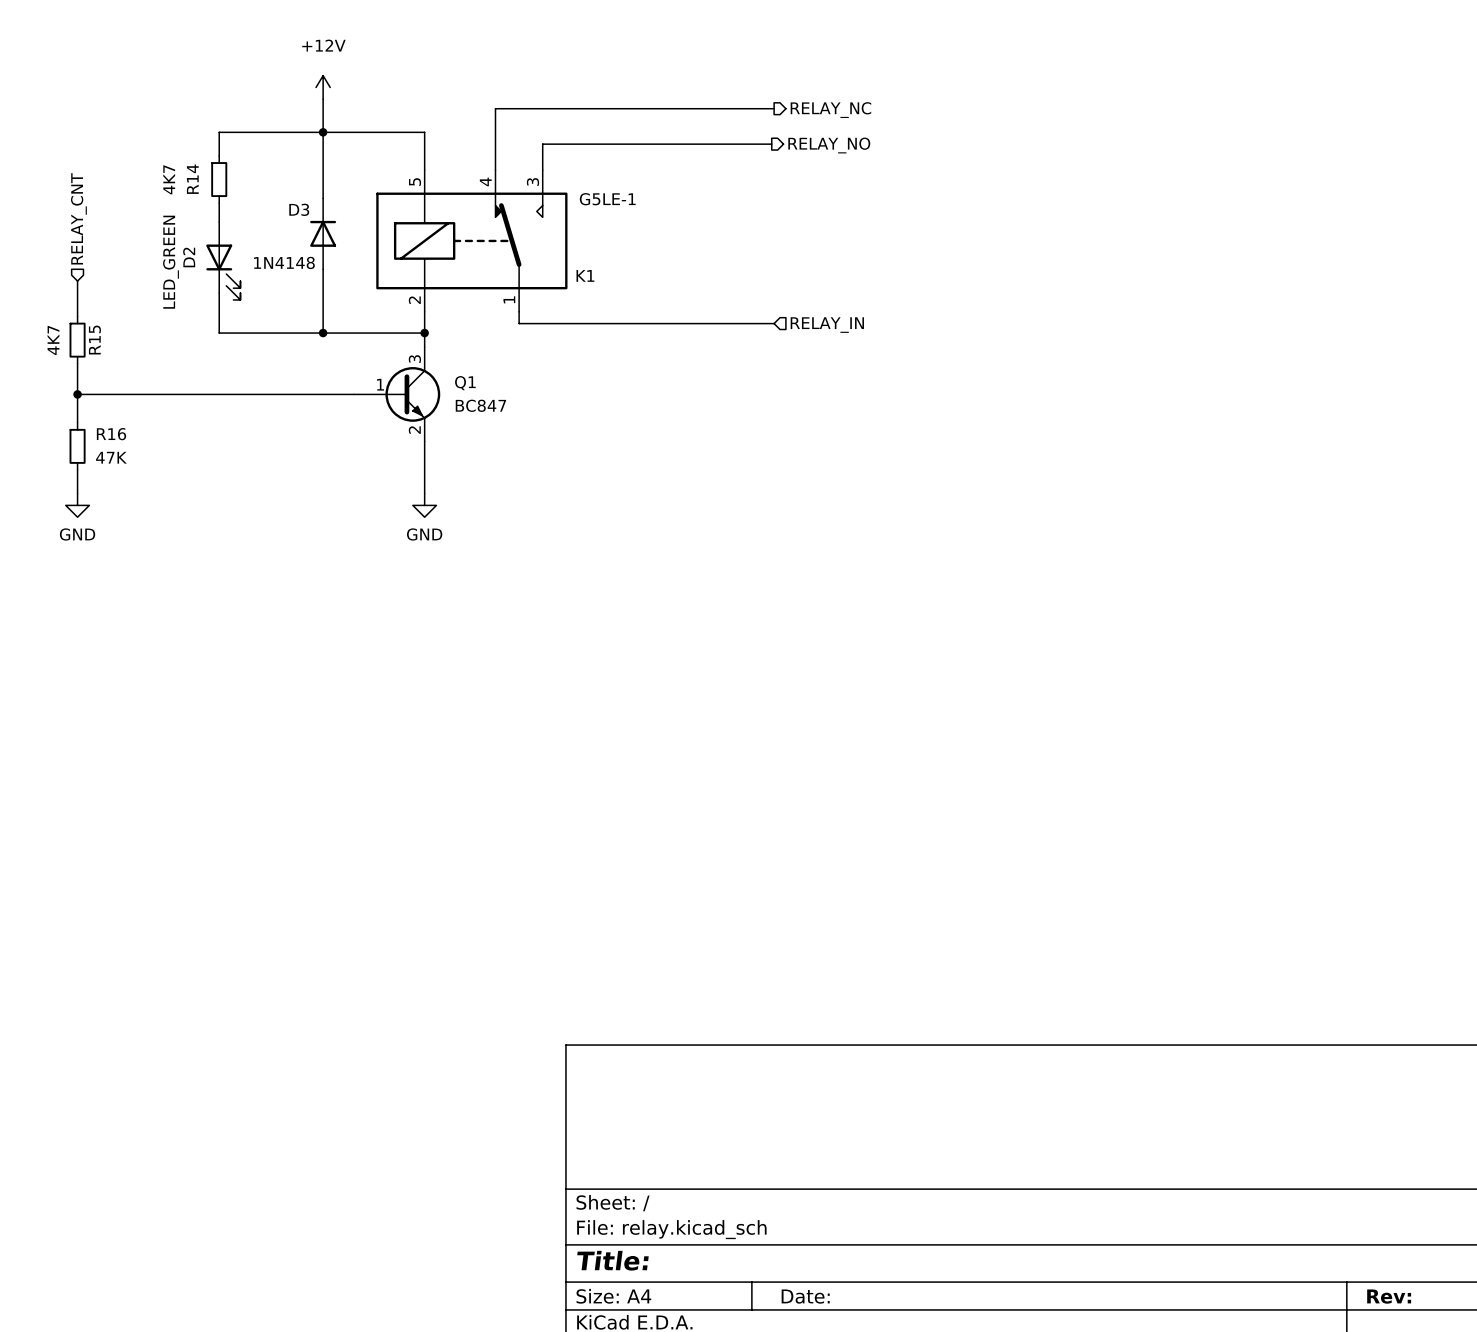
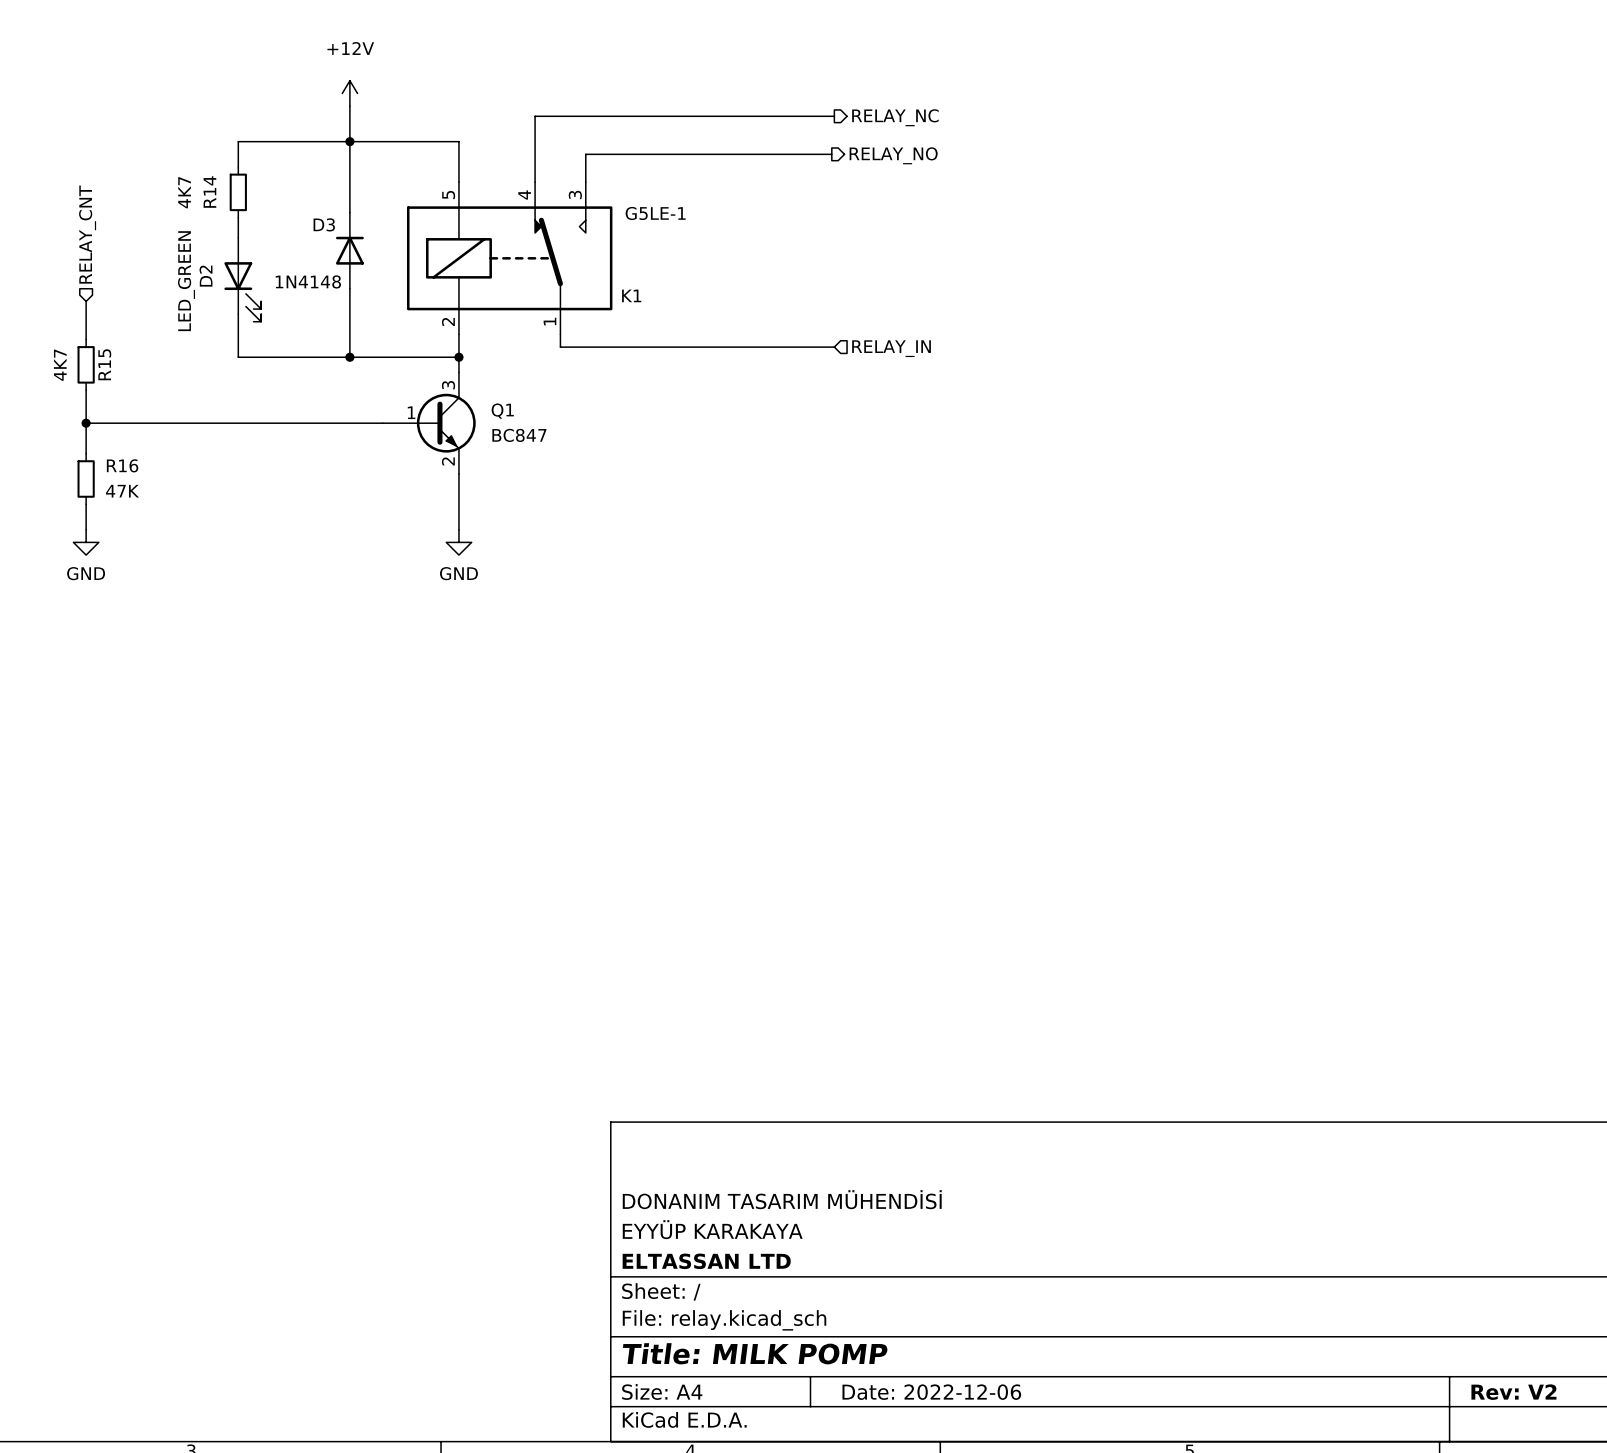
title block: none -> DONANIM TASARIM MÜHENDİSİ (782, 1199)
title block: none -> EYYÜP KARAKAYA (712, 1229)
title block: none -> ELTASSAN LTD (706, 1261)
title block: Title: (612, 1260) -> Title: MILK POMP (755, 1353)
title block: Date: (805, 1296) -> Date: 2022-12-06 (931, 1392)
title block: Rev: (1389, 1296) -> Rev: V2 (1513, 1392)

